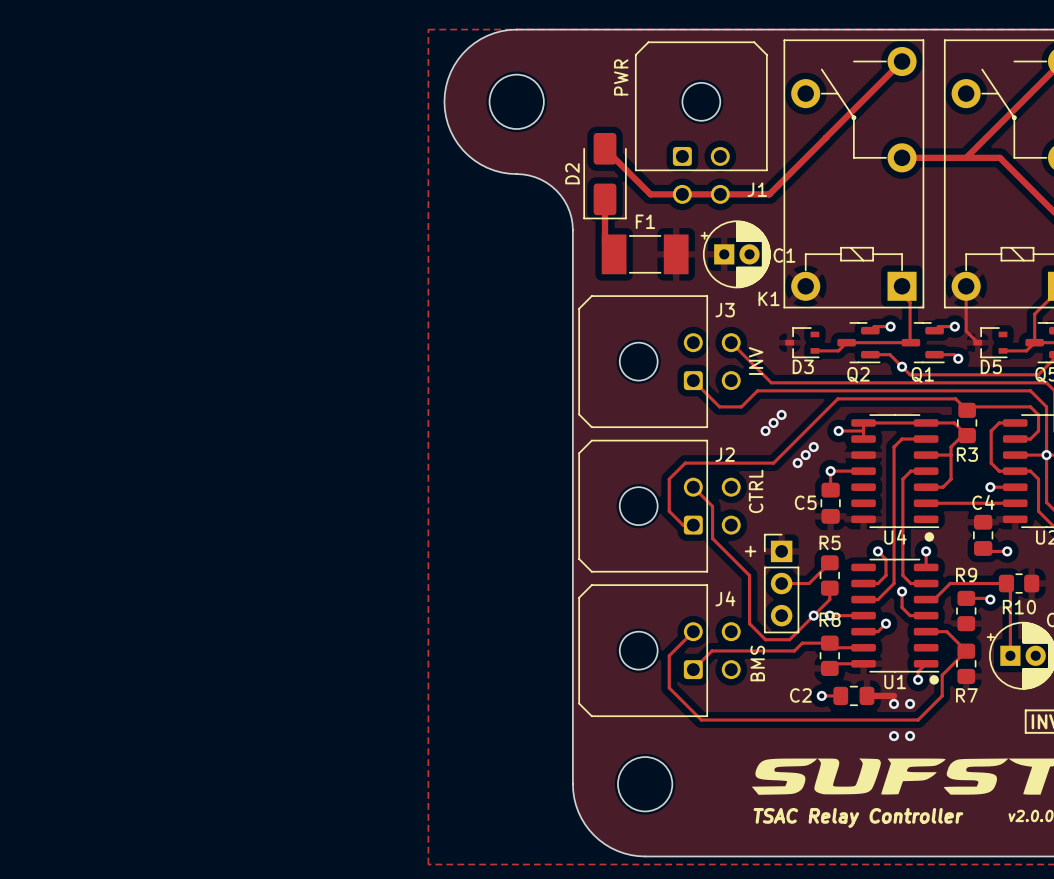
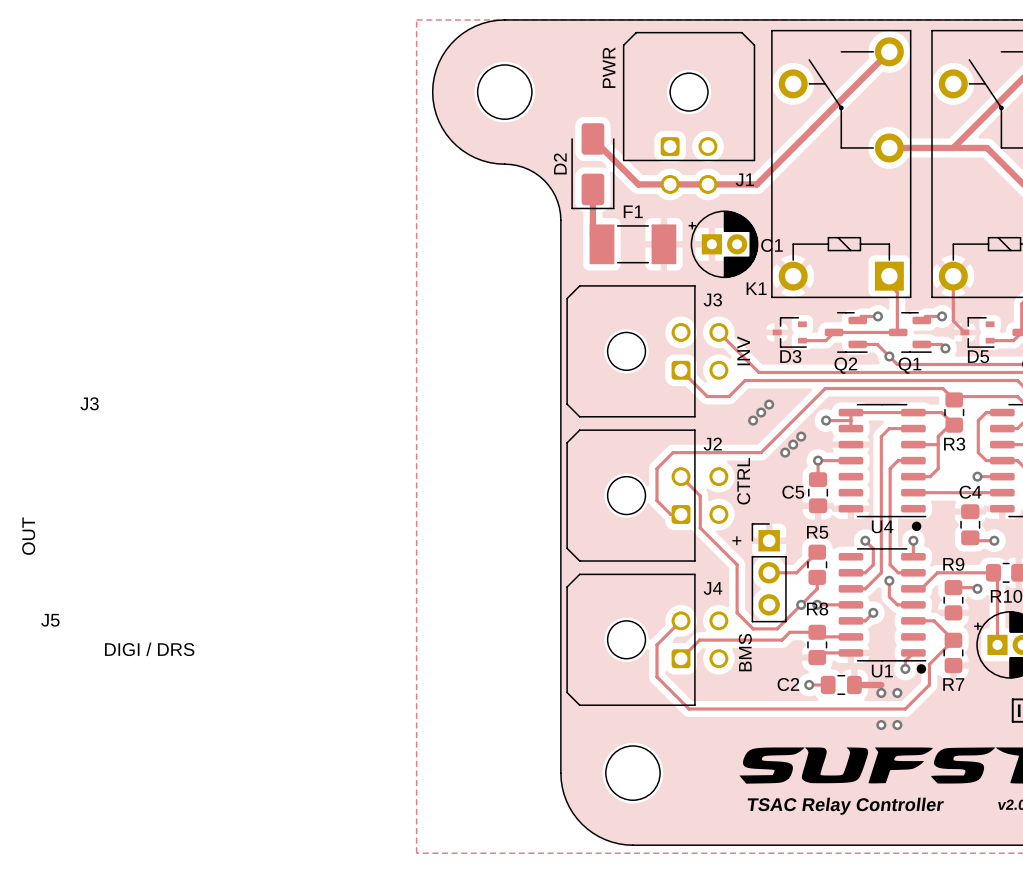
text: none -> J3 (89, 403)
text: none -> OUT (28, 536)
text: none -> J5 (50, 620)
text: none -> DIGI / DRS (149, 649)

